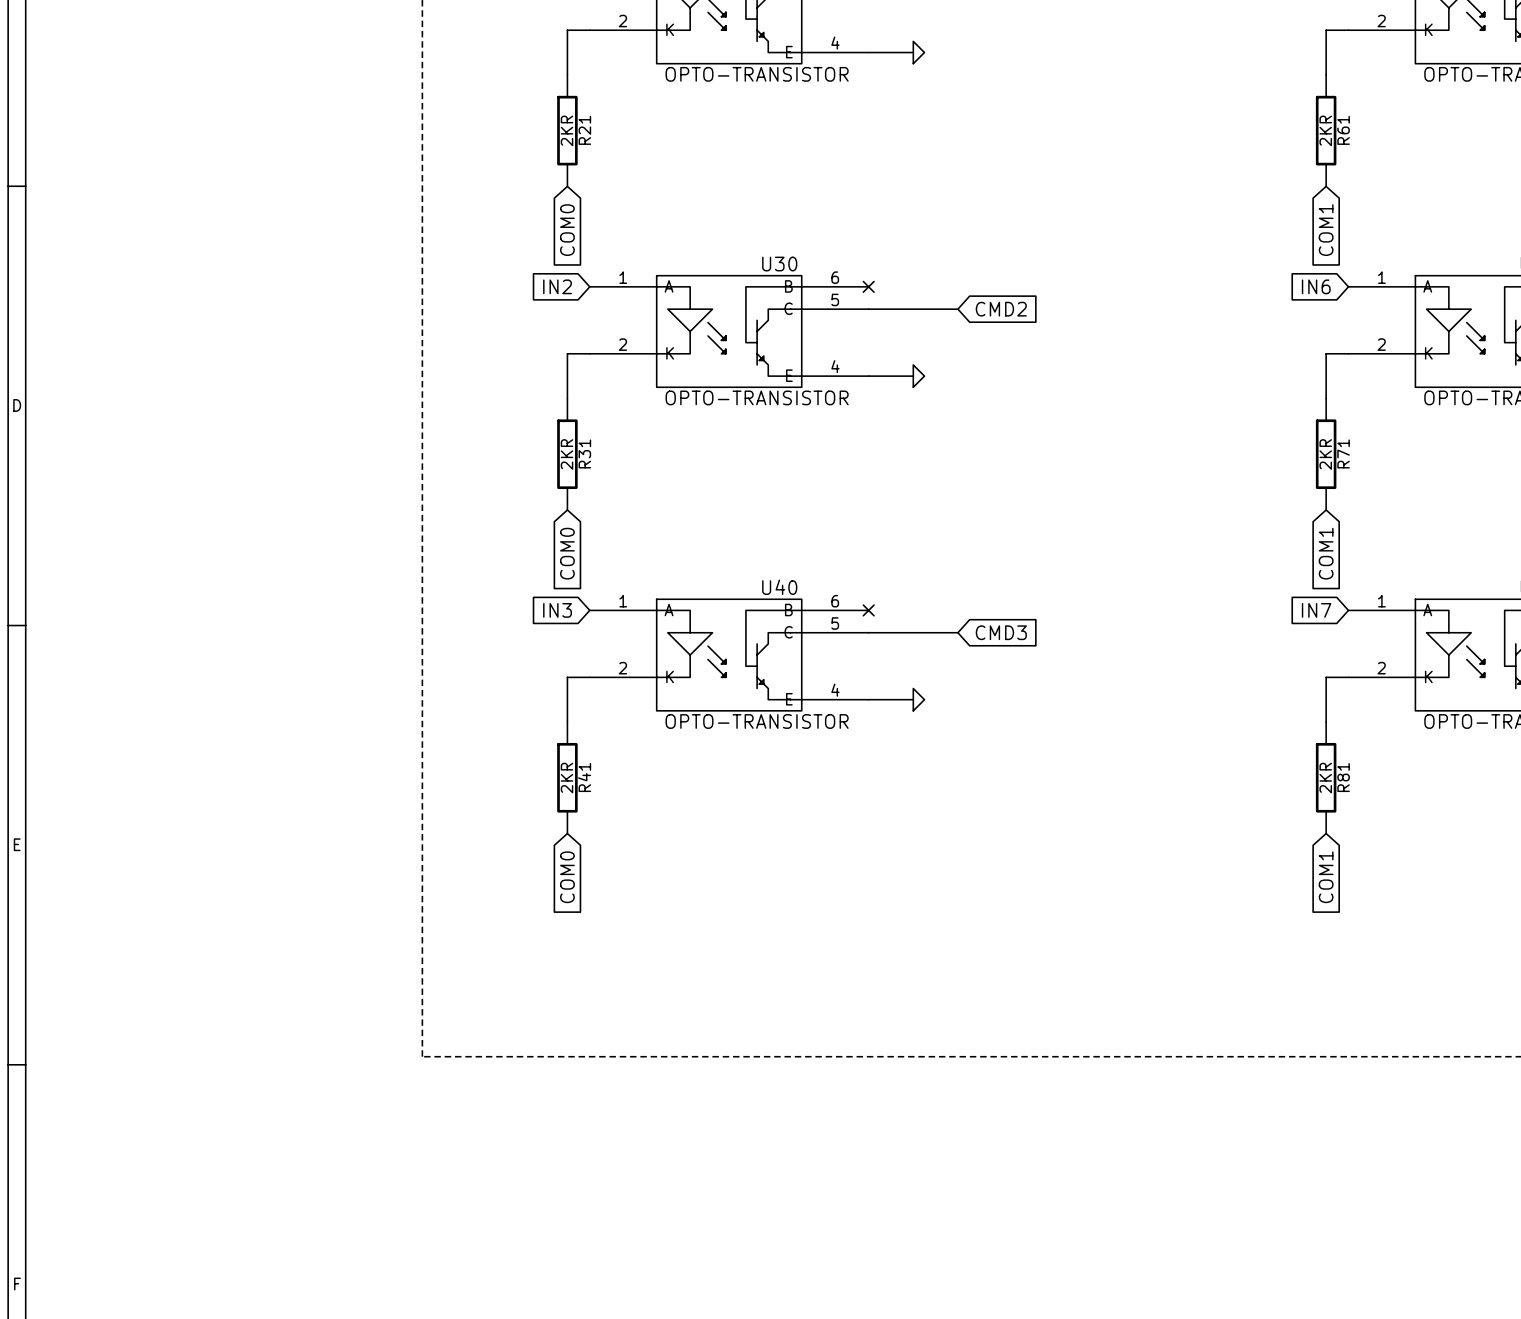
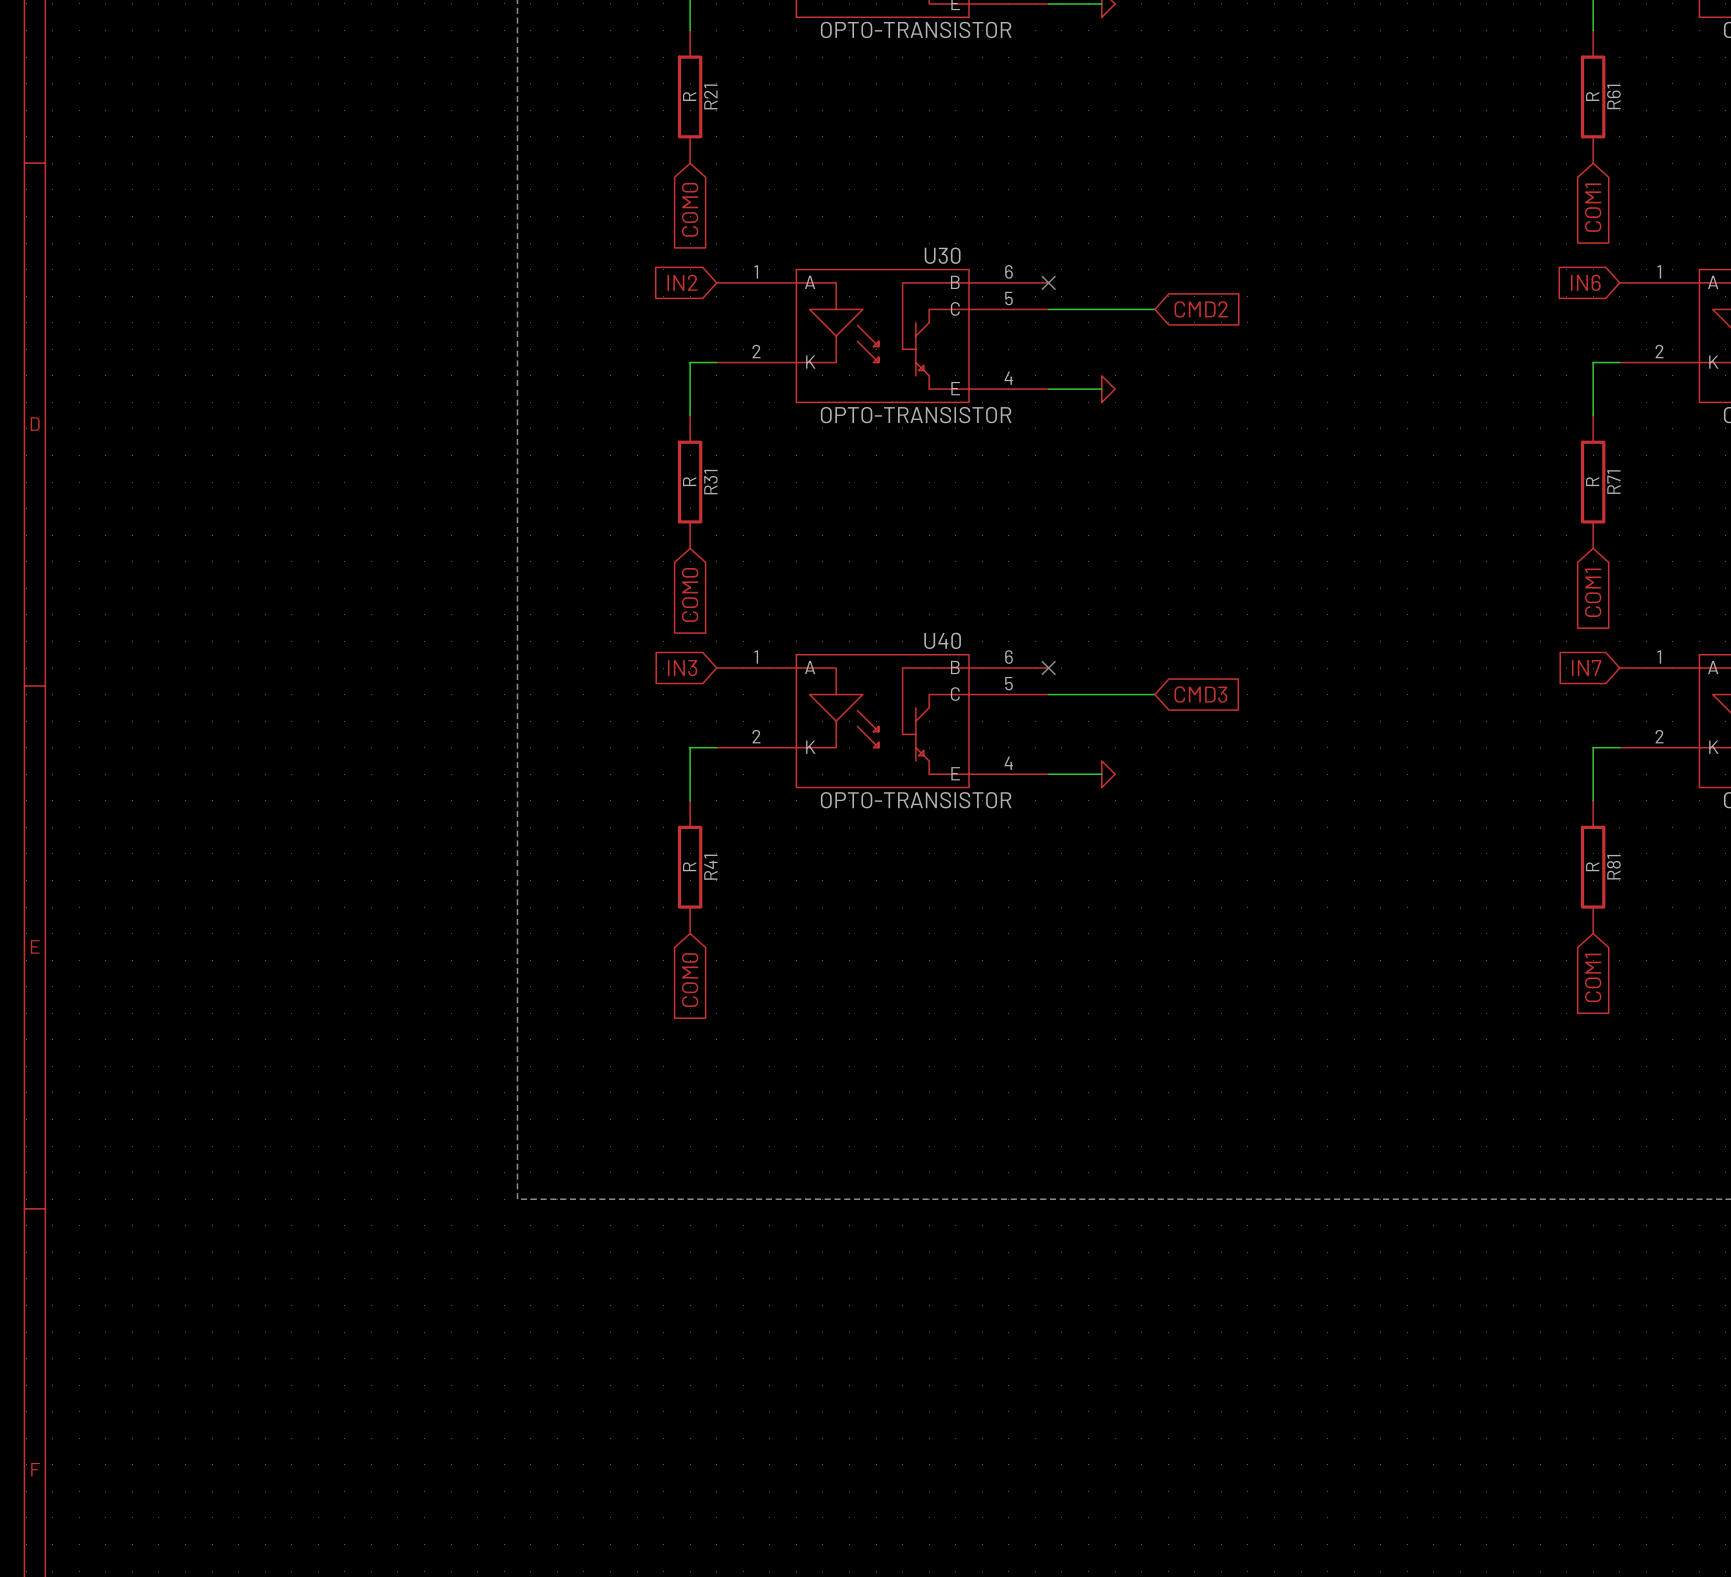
R21 value: 2KR (567, 130) -> R (689, 96)
R61 value: 2KR (1325, 130) -> R (1592, 96)
R31 value: 2KR (567, 454) -> R (689, 481)
R71 value: 2KR (1325, 454) -> R (1592, 481)
R41 value: 2KR (567, 778) -> R (689, 866)
R81 value: 2KR (1325, 778) -> R (1592, 866)

